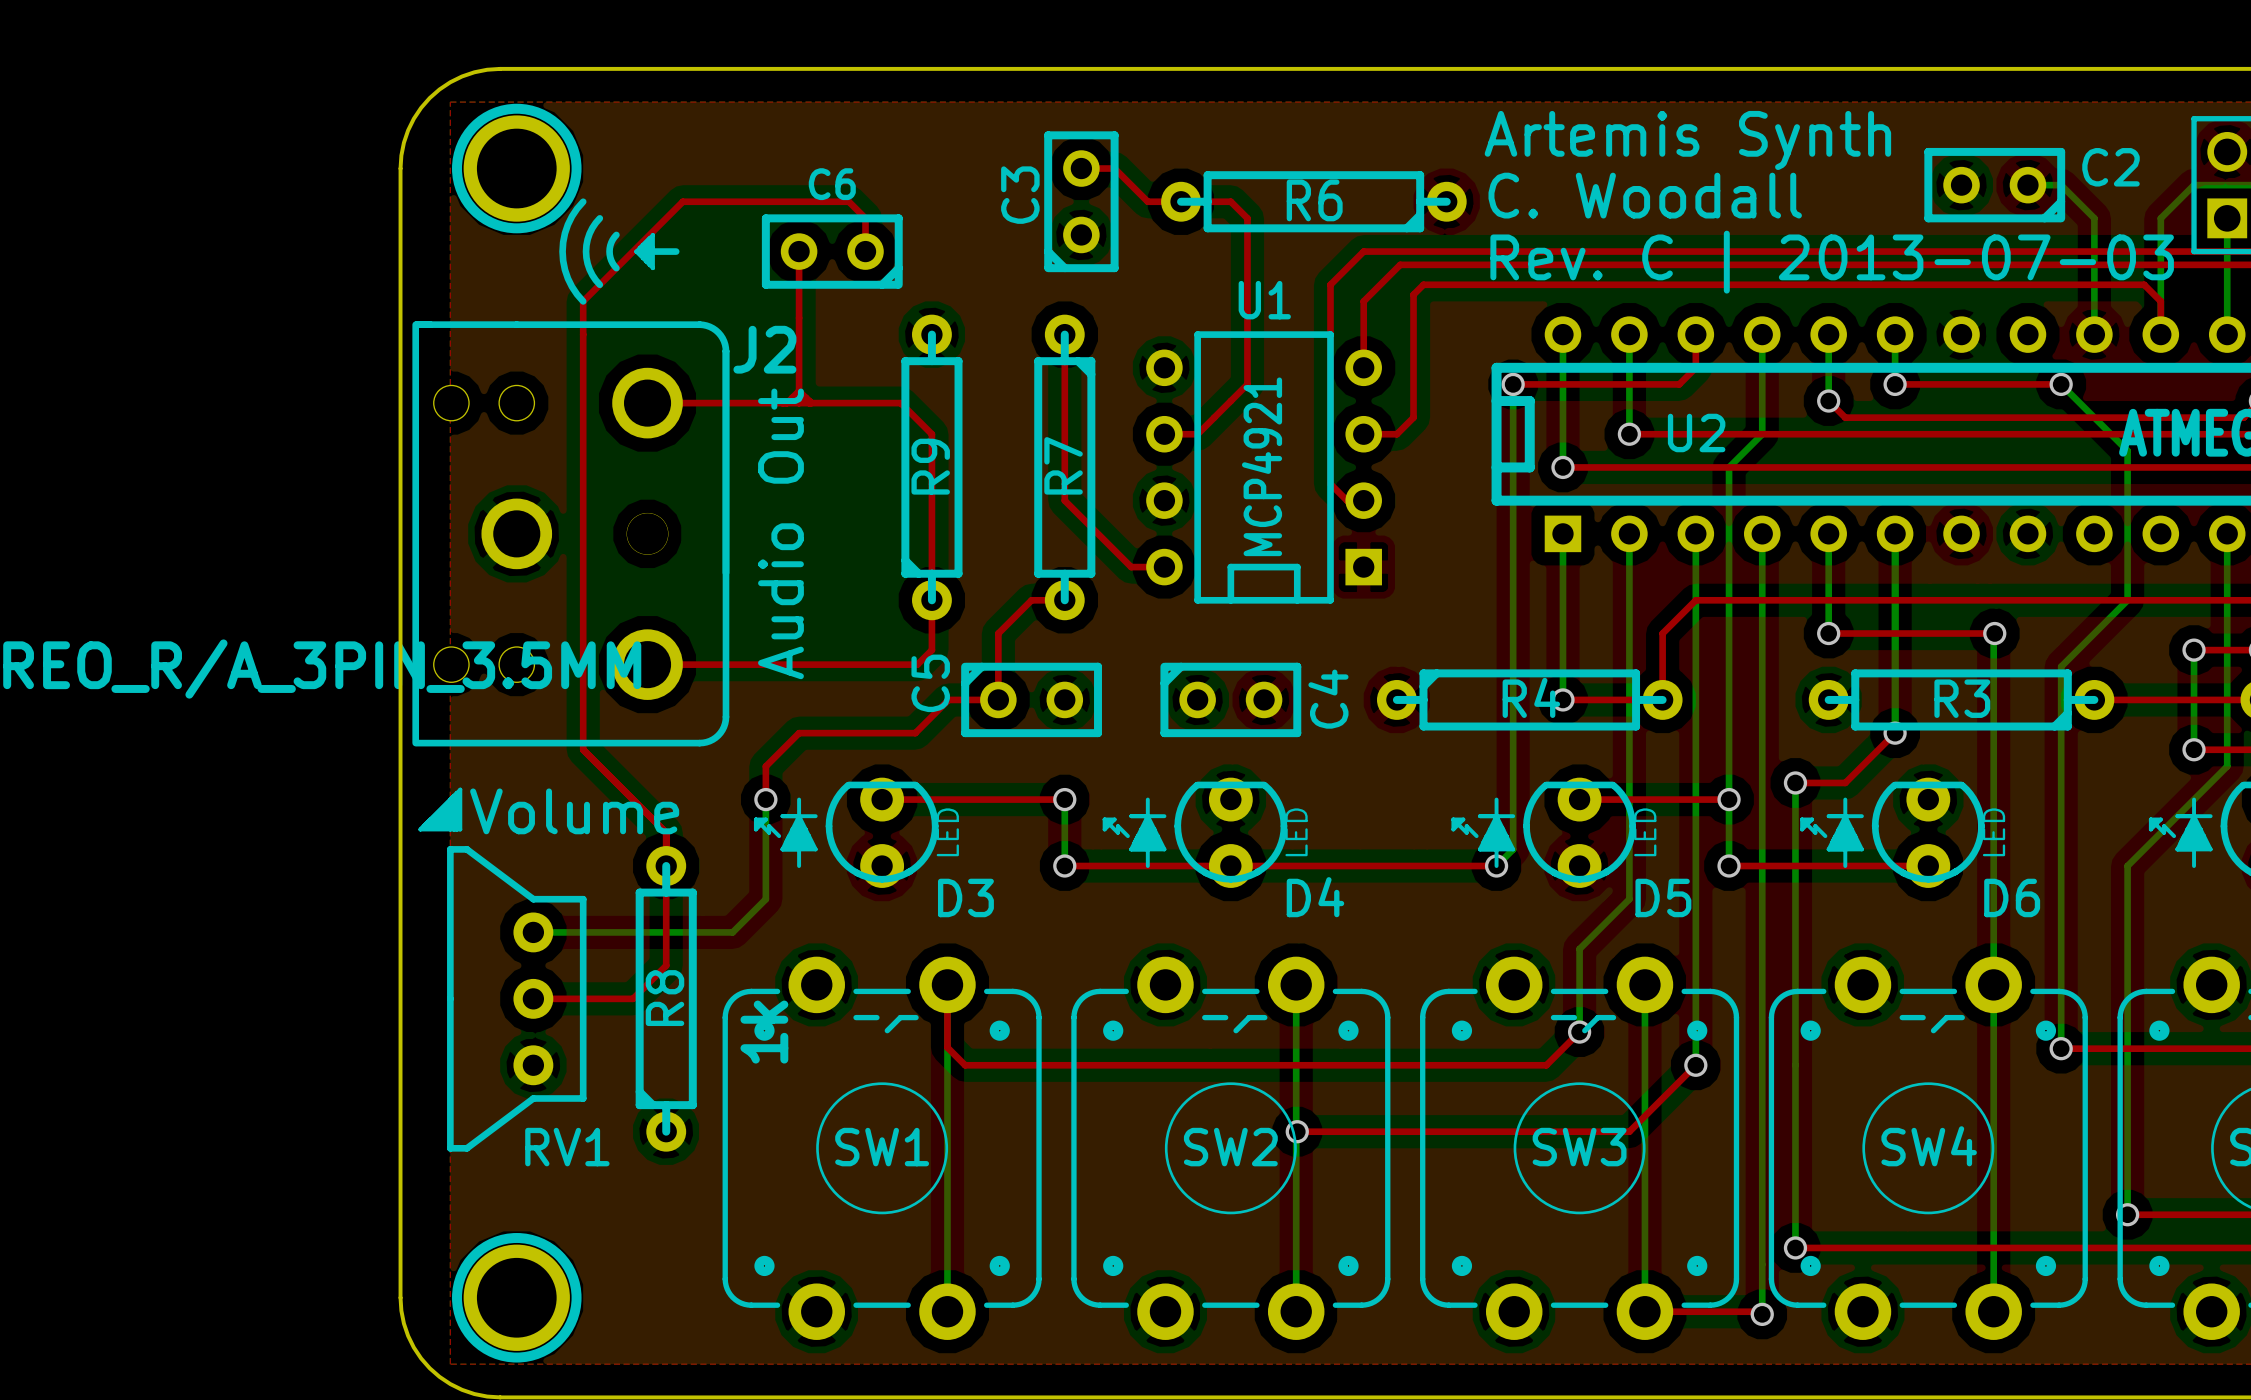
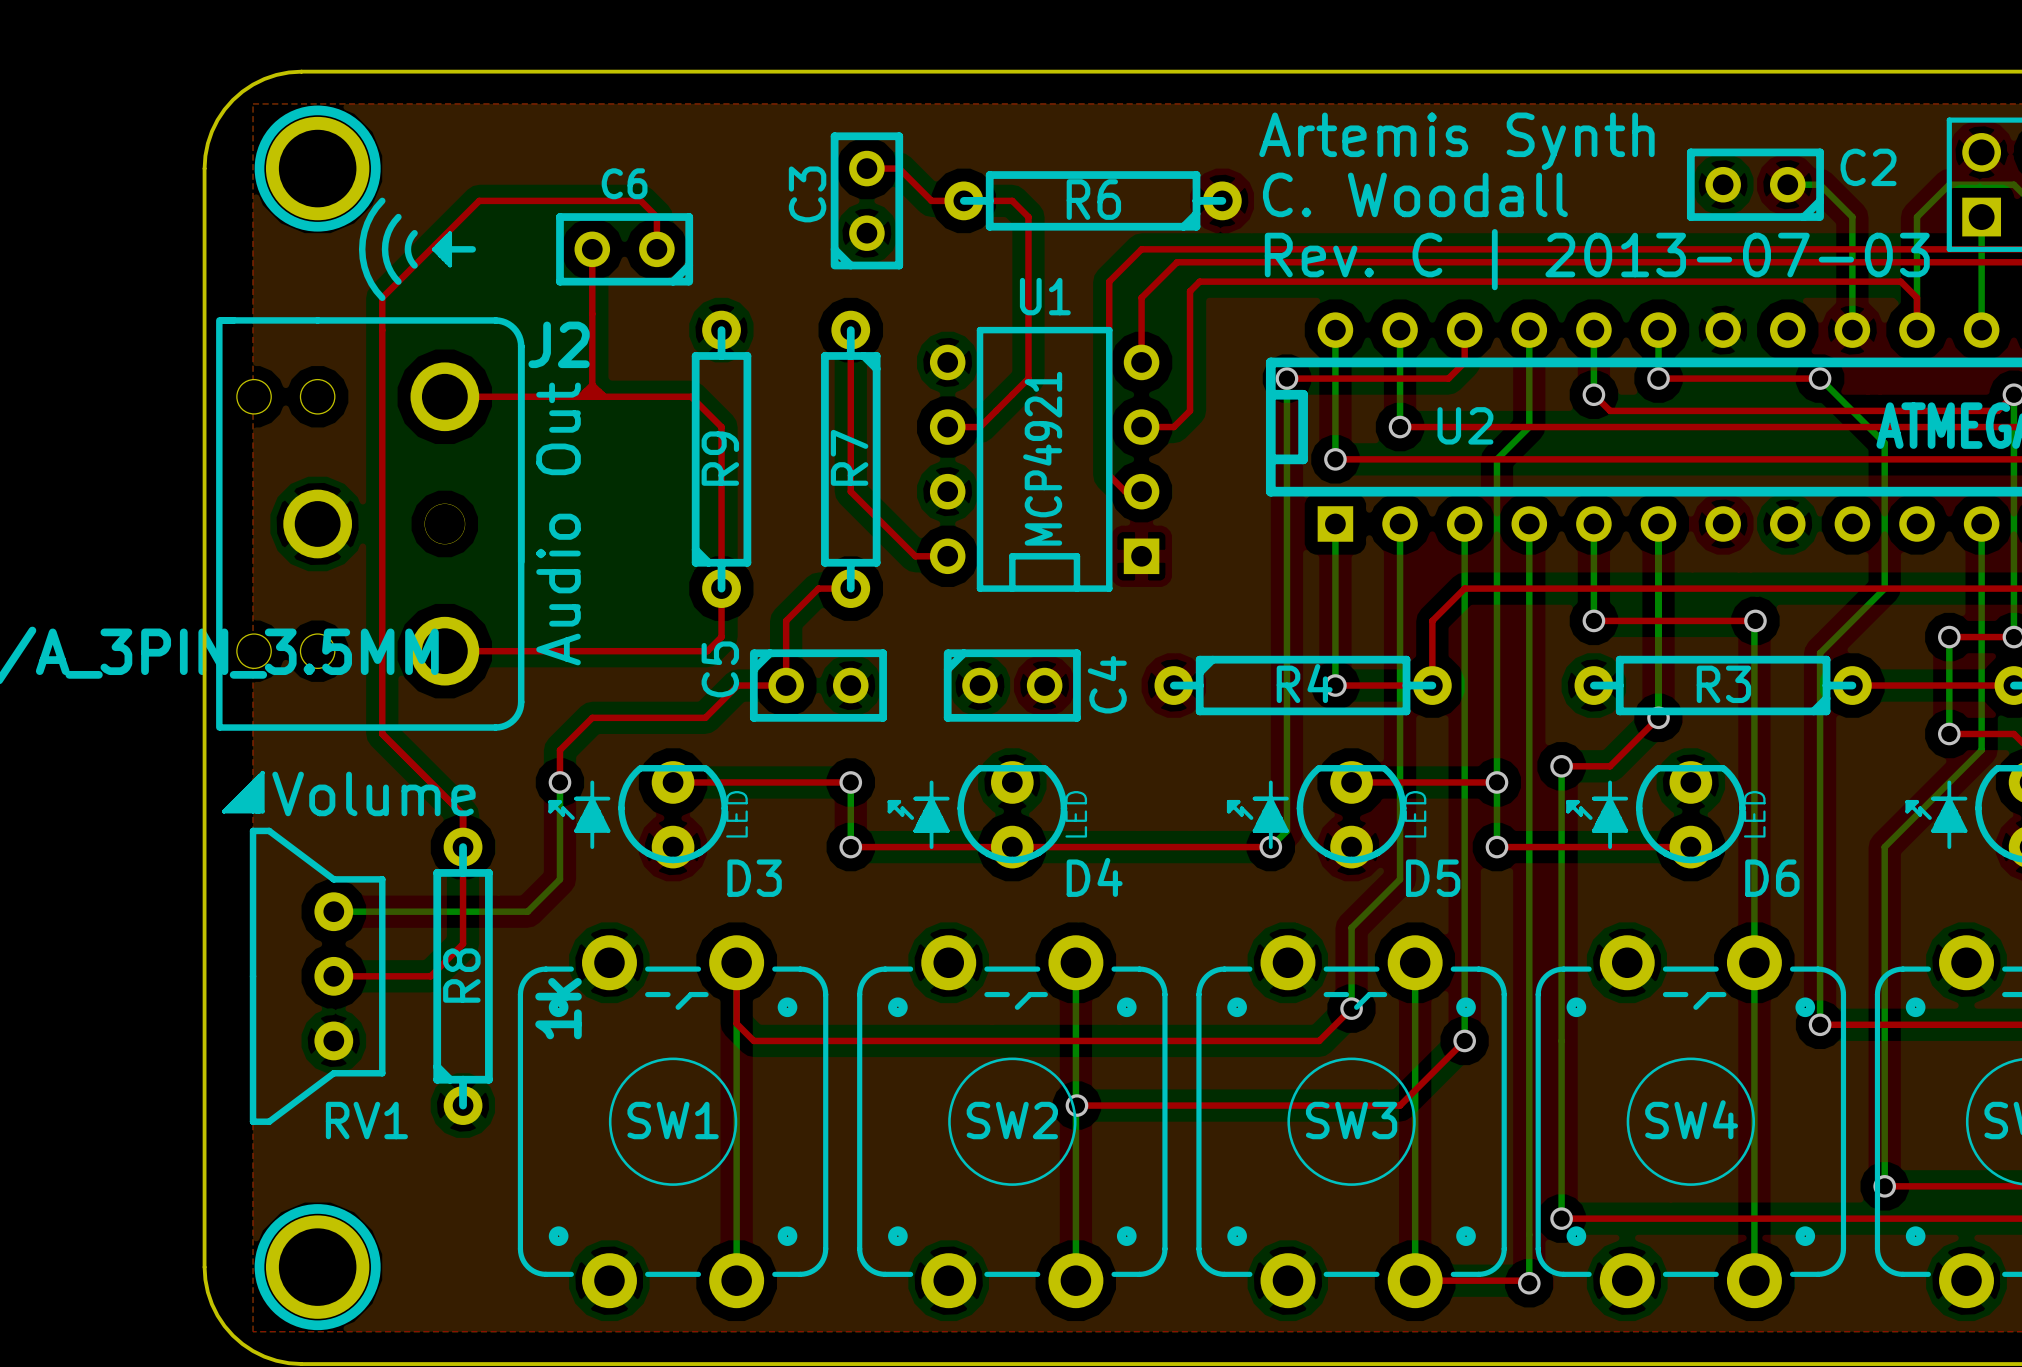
text position: Audio Out (780, 533) -> Audio Out (558, 523)

